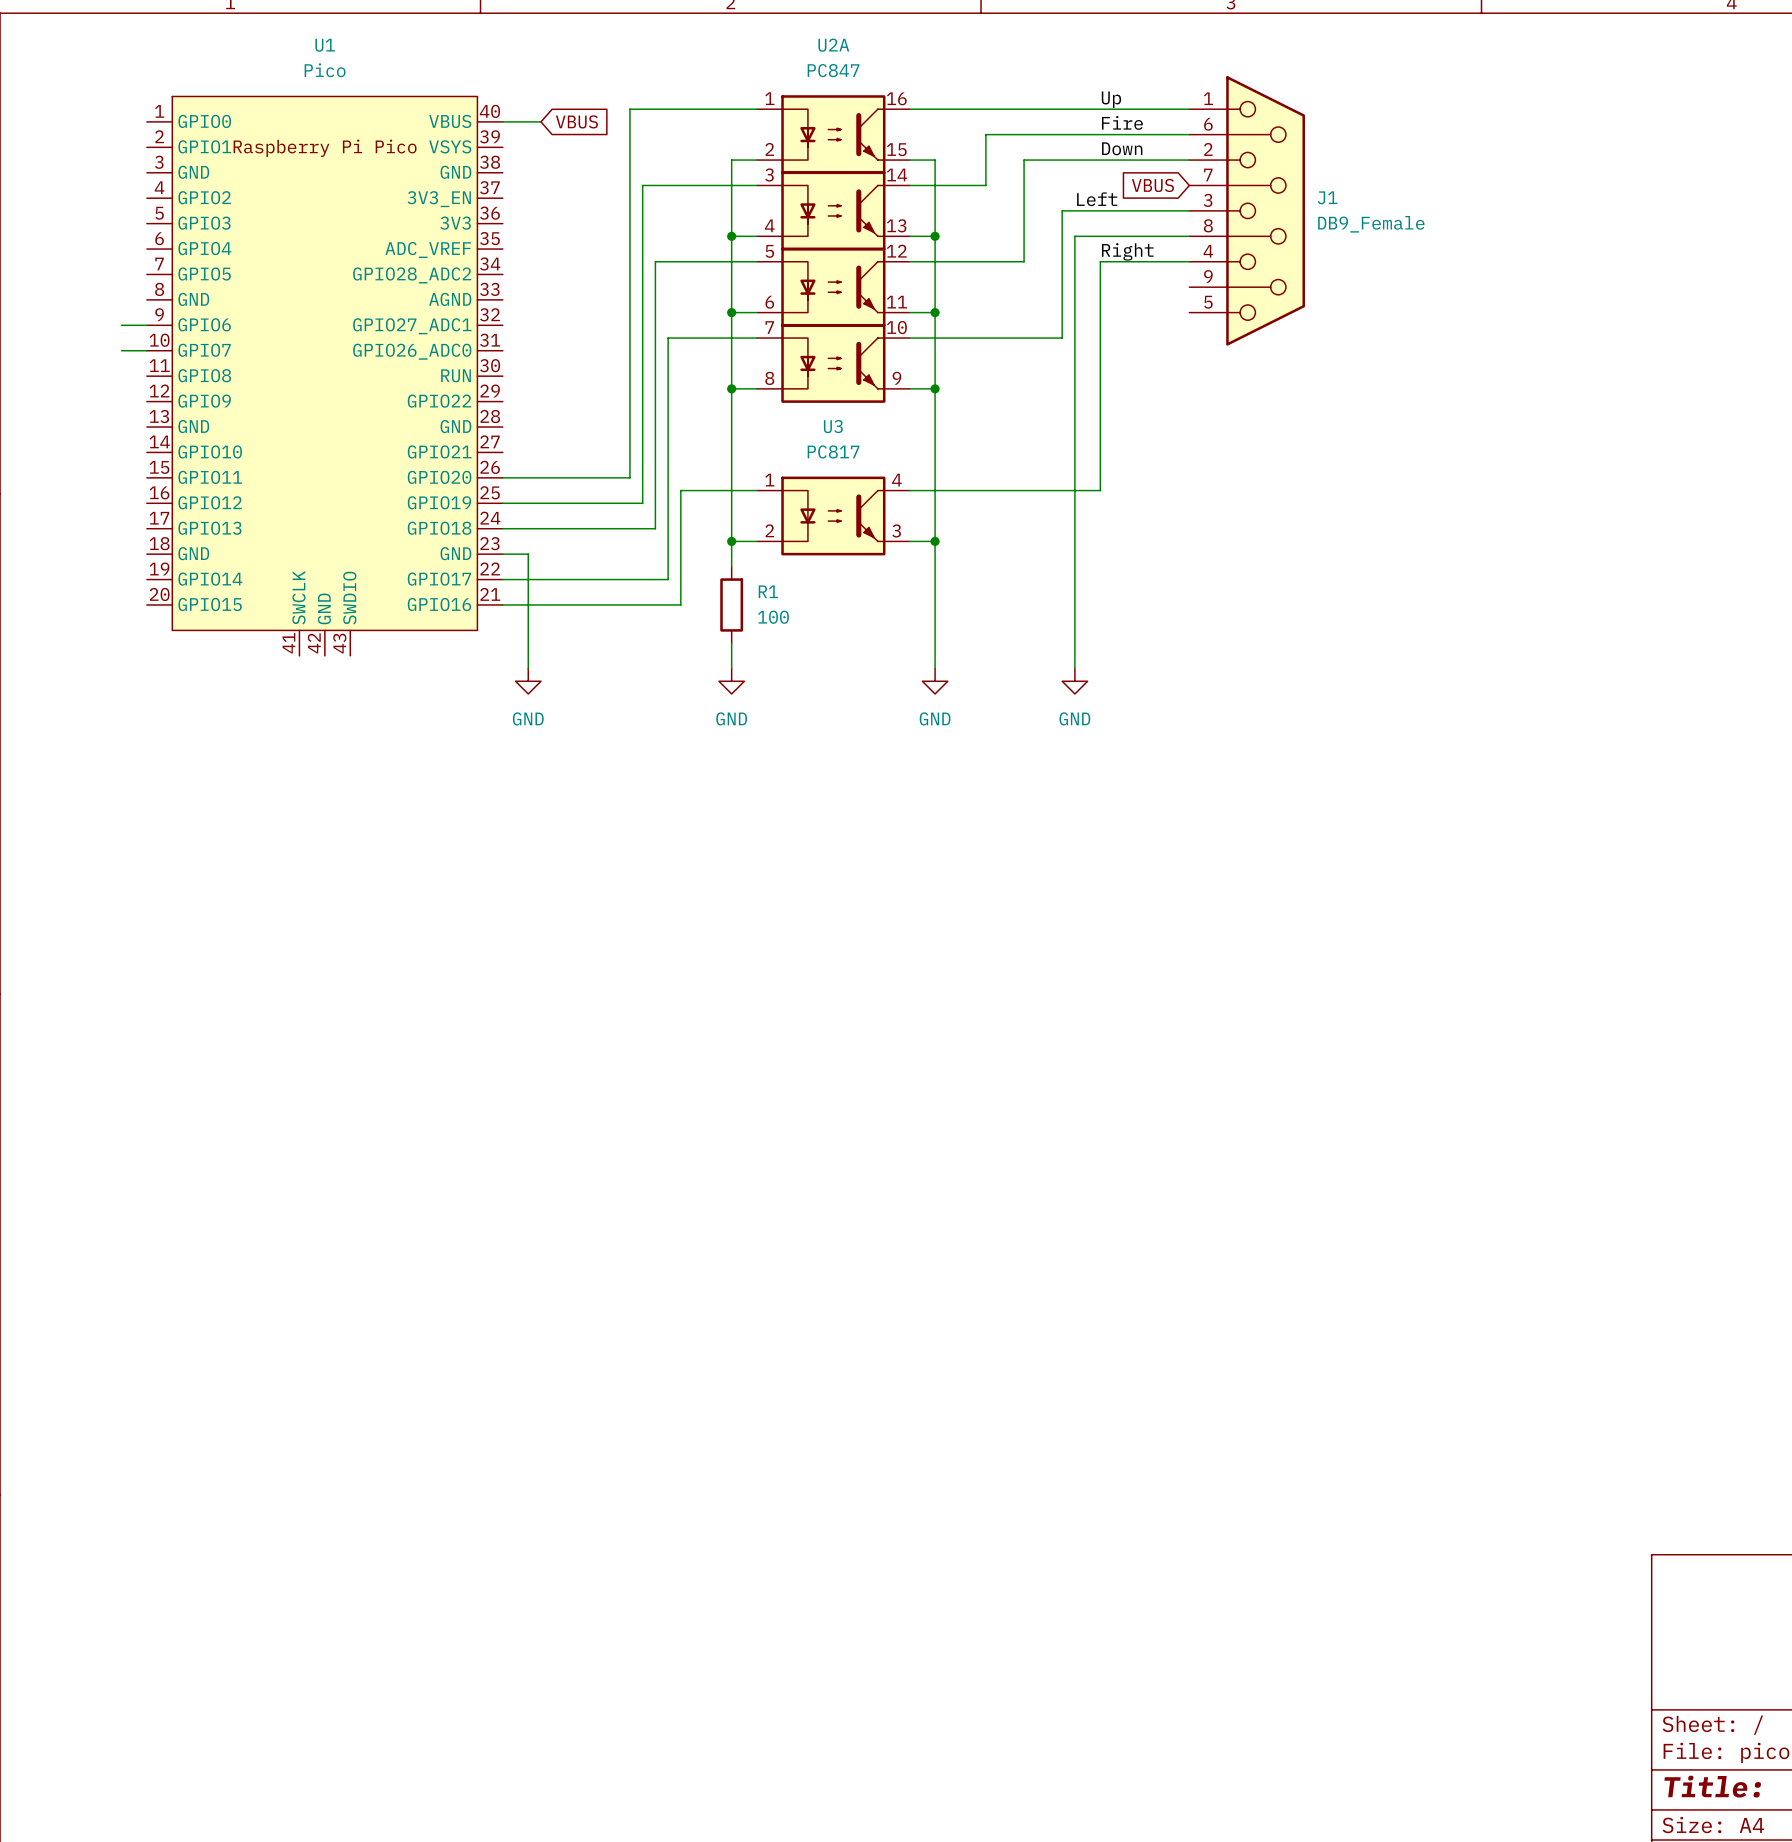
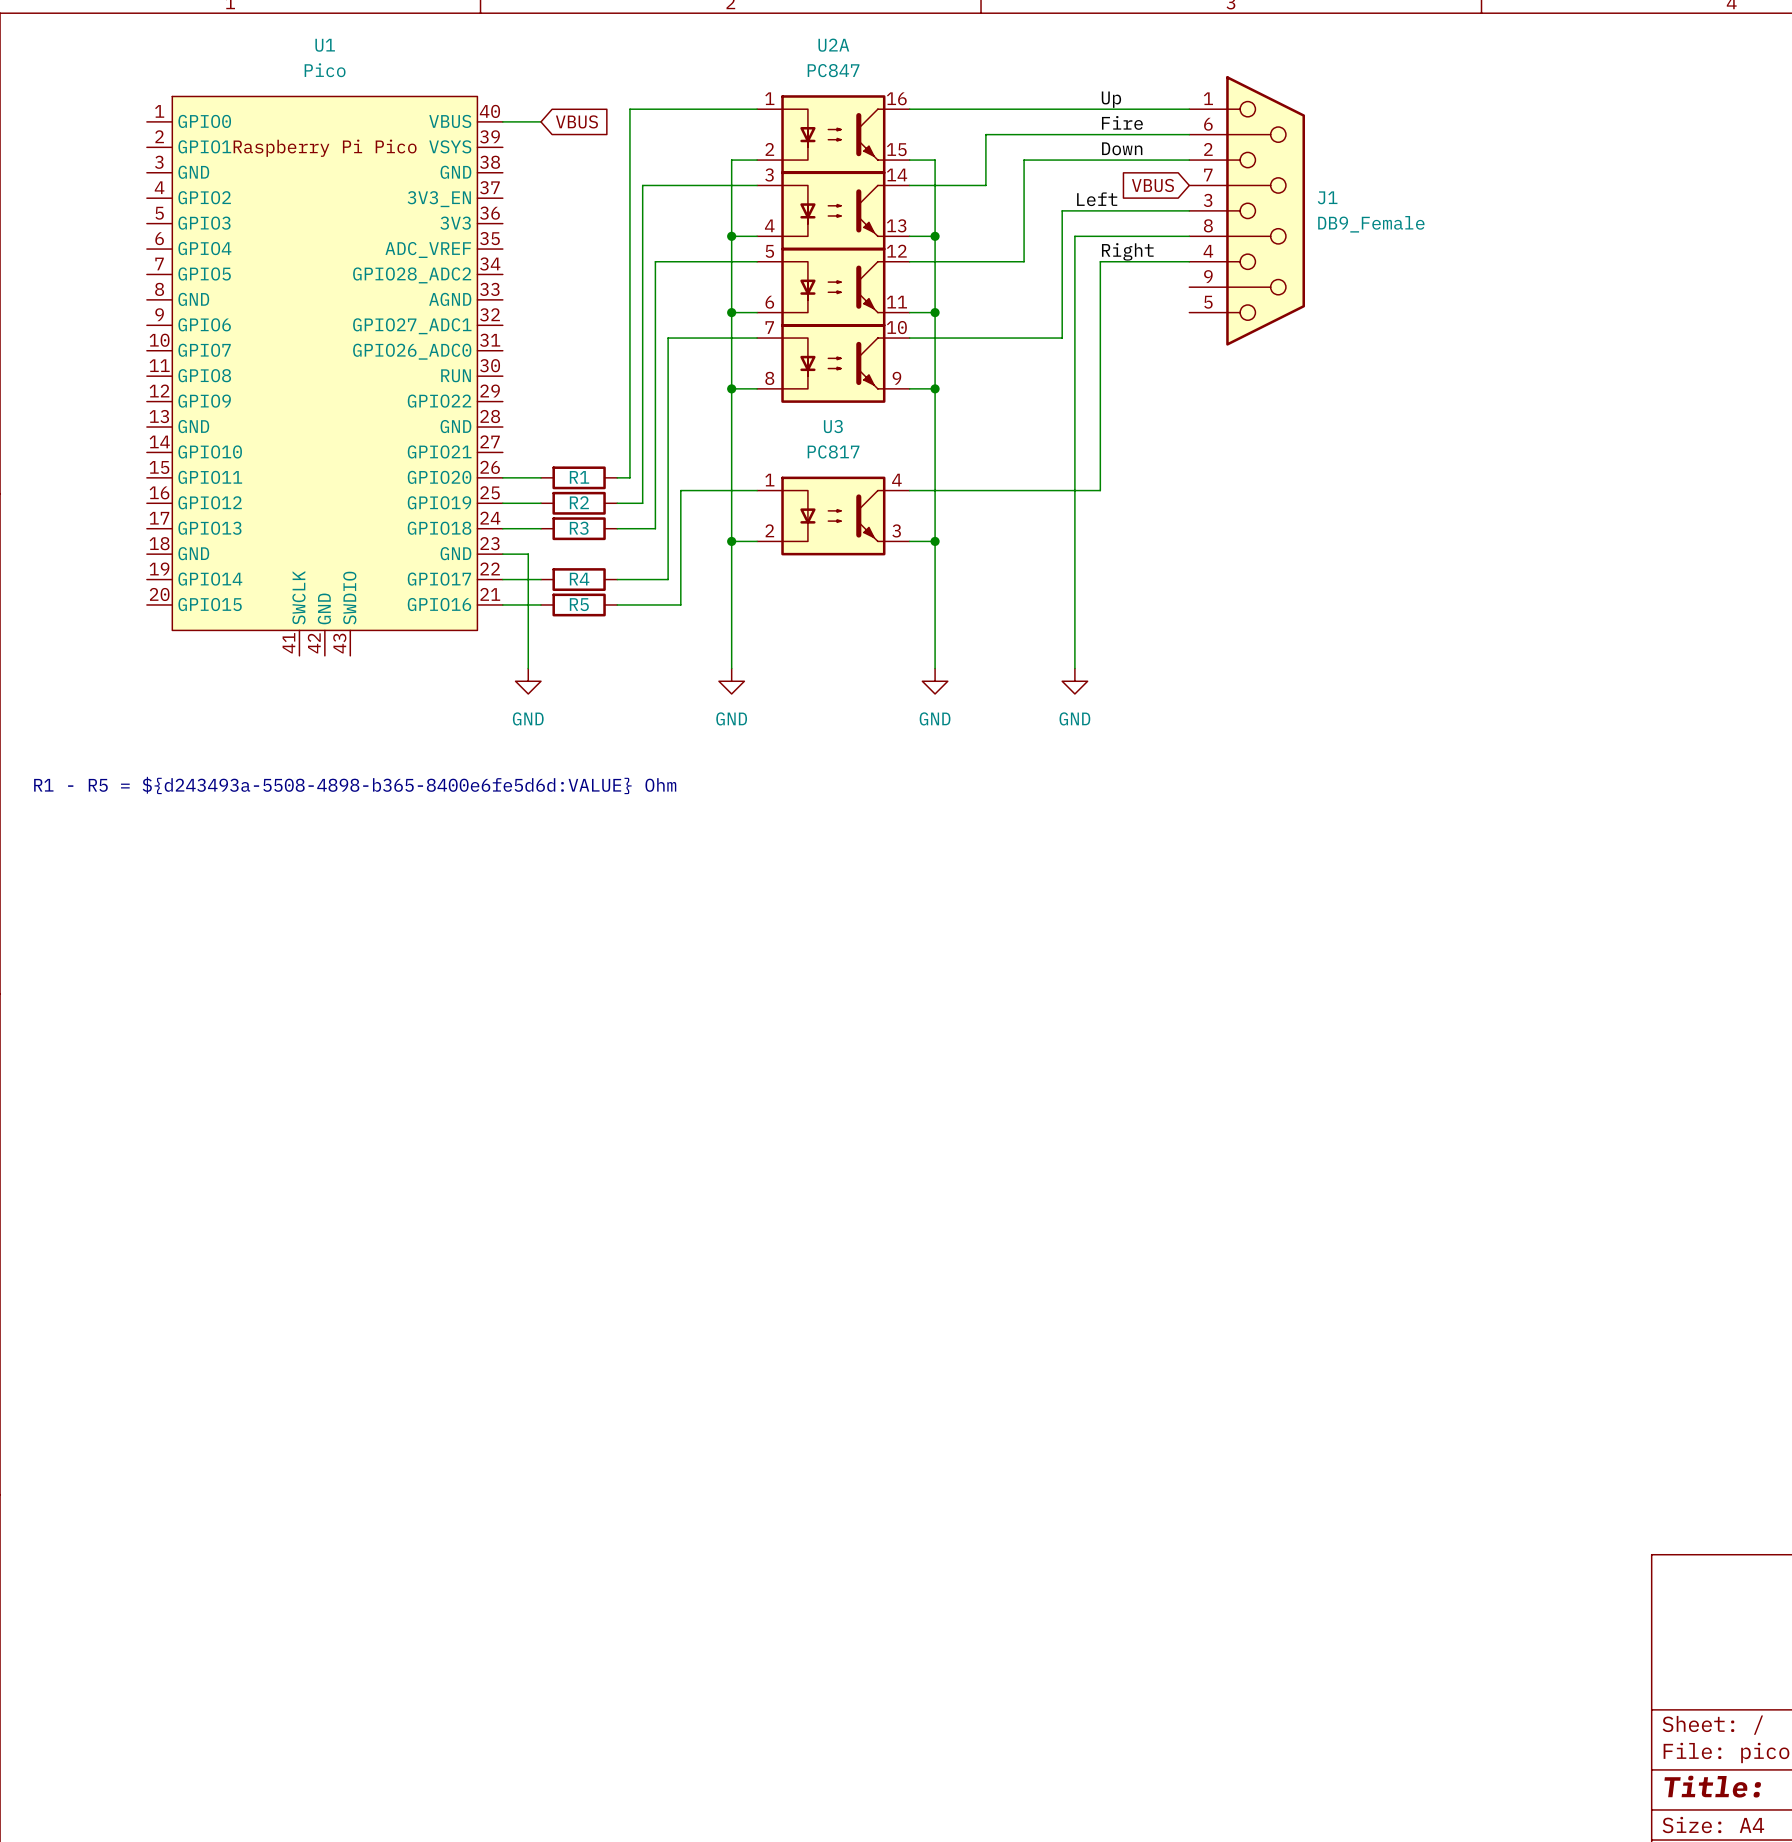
wire: (121, 325) (146, 325) -> none
wire: (121, 350) (146, 350) -> none
wire: (540, 477) (617, 477) -> none
wire: (540, 503) (617, 503) -> none
R2: none -> (579, 503)
wire: (540, 528) (617, 528) -> none
R3: none -> (579, 528)
wire: none -> (731, 566) (731, 643)
wire: (540, 579) (617, 579) -> none
R4: none -> (579, 579)
R1 name position: R1 (768, 591) -> R1 (579, 477)
wire: (540, 604) (617, 604) -> none
R5: none -> (579, 604)
R1 rotation: 0° (731, 604) -> 90° clockwise (579, 477)
R1 position: (731, 604) -> (579, 477)
R1 value: 100 (773, 617) -> none
text: none -> R1 - R5 = ${d243493a-5508-4898-b365-8400e6fe5d6d:VALUE} Ohm (355, 785)

